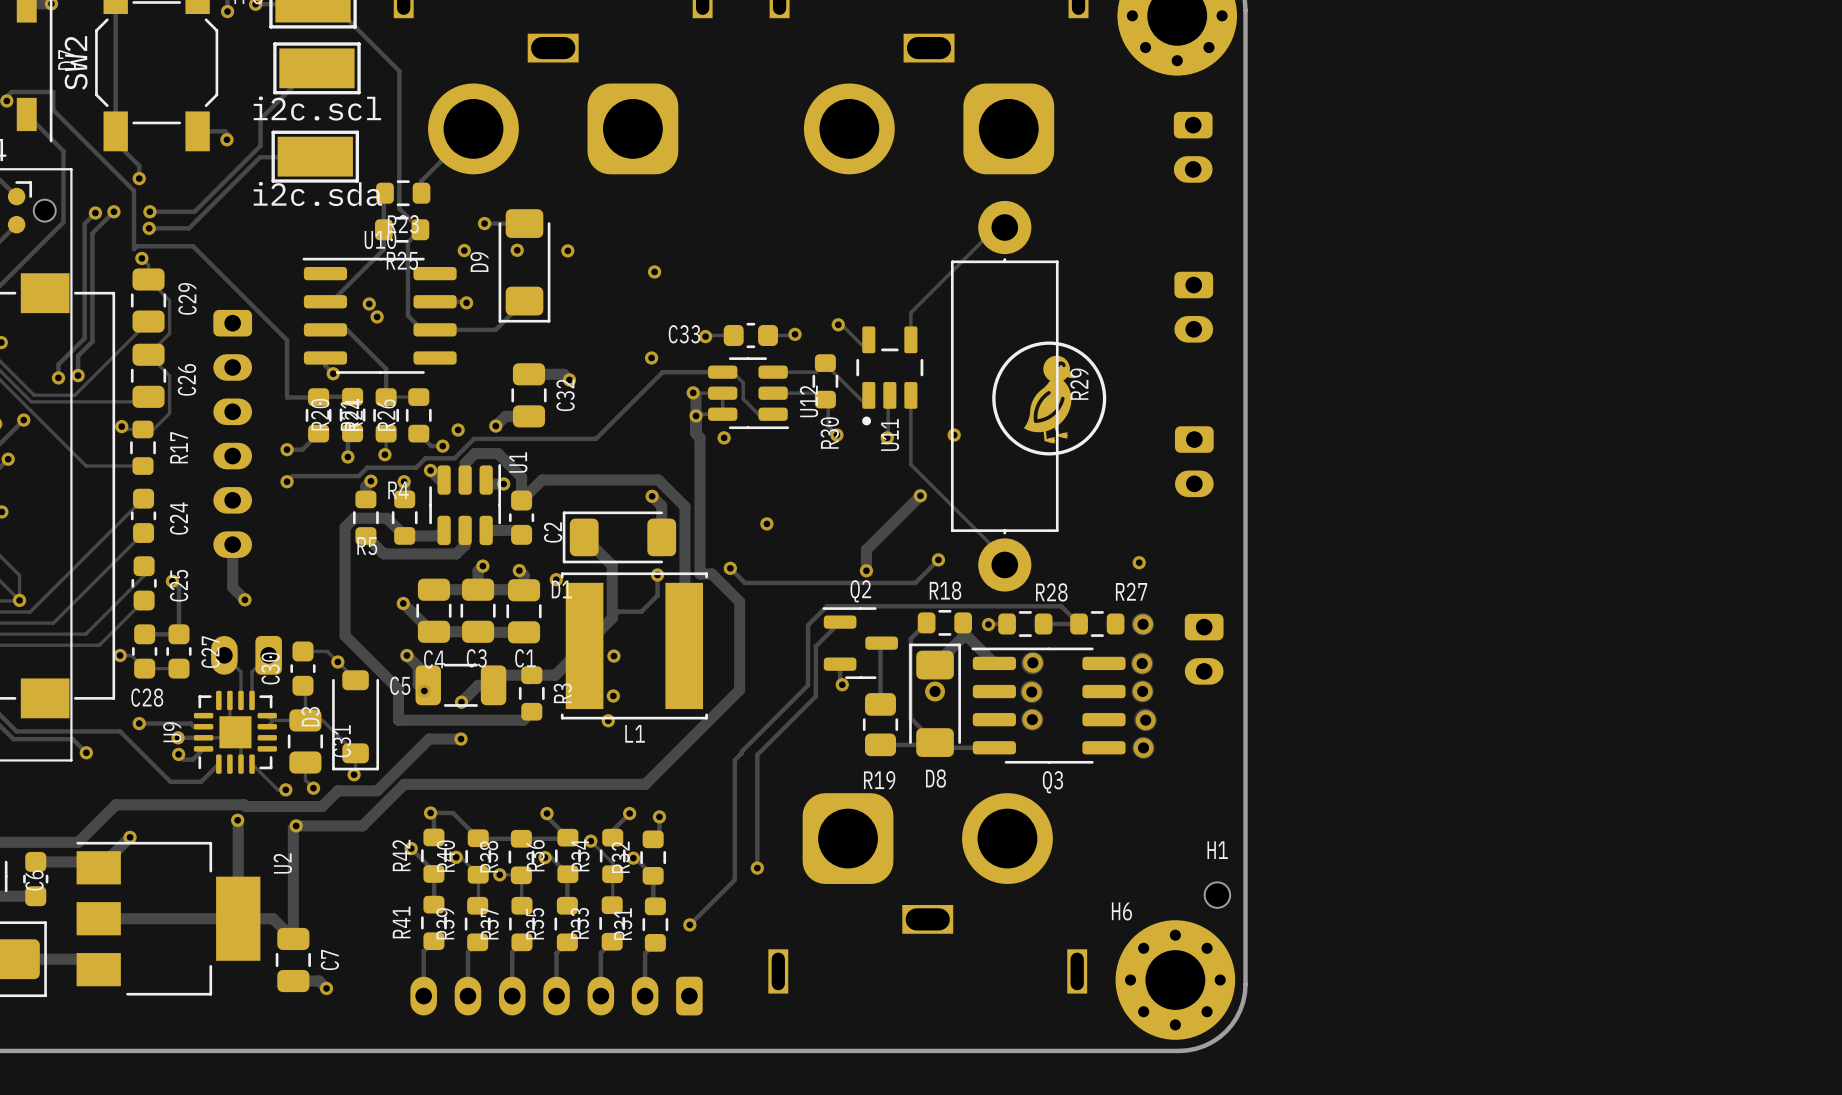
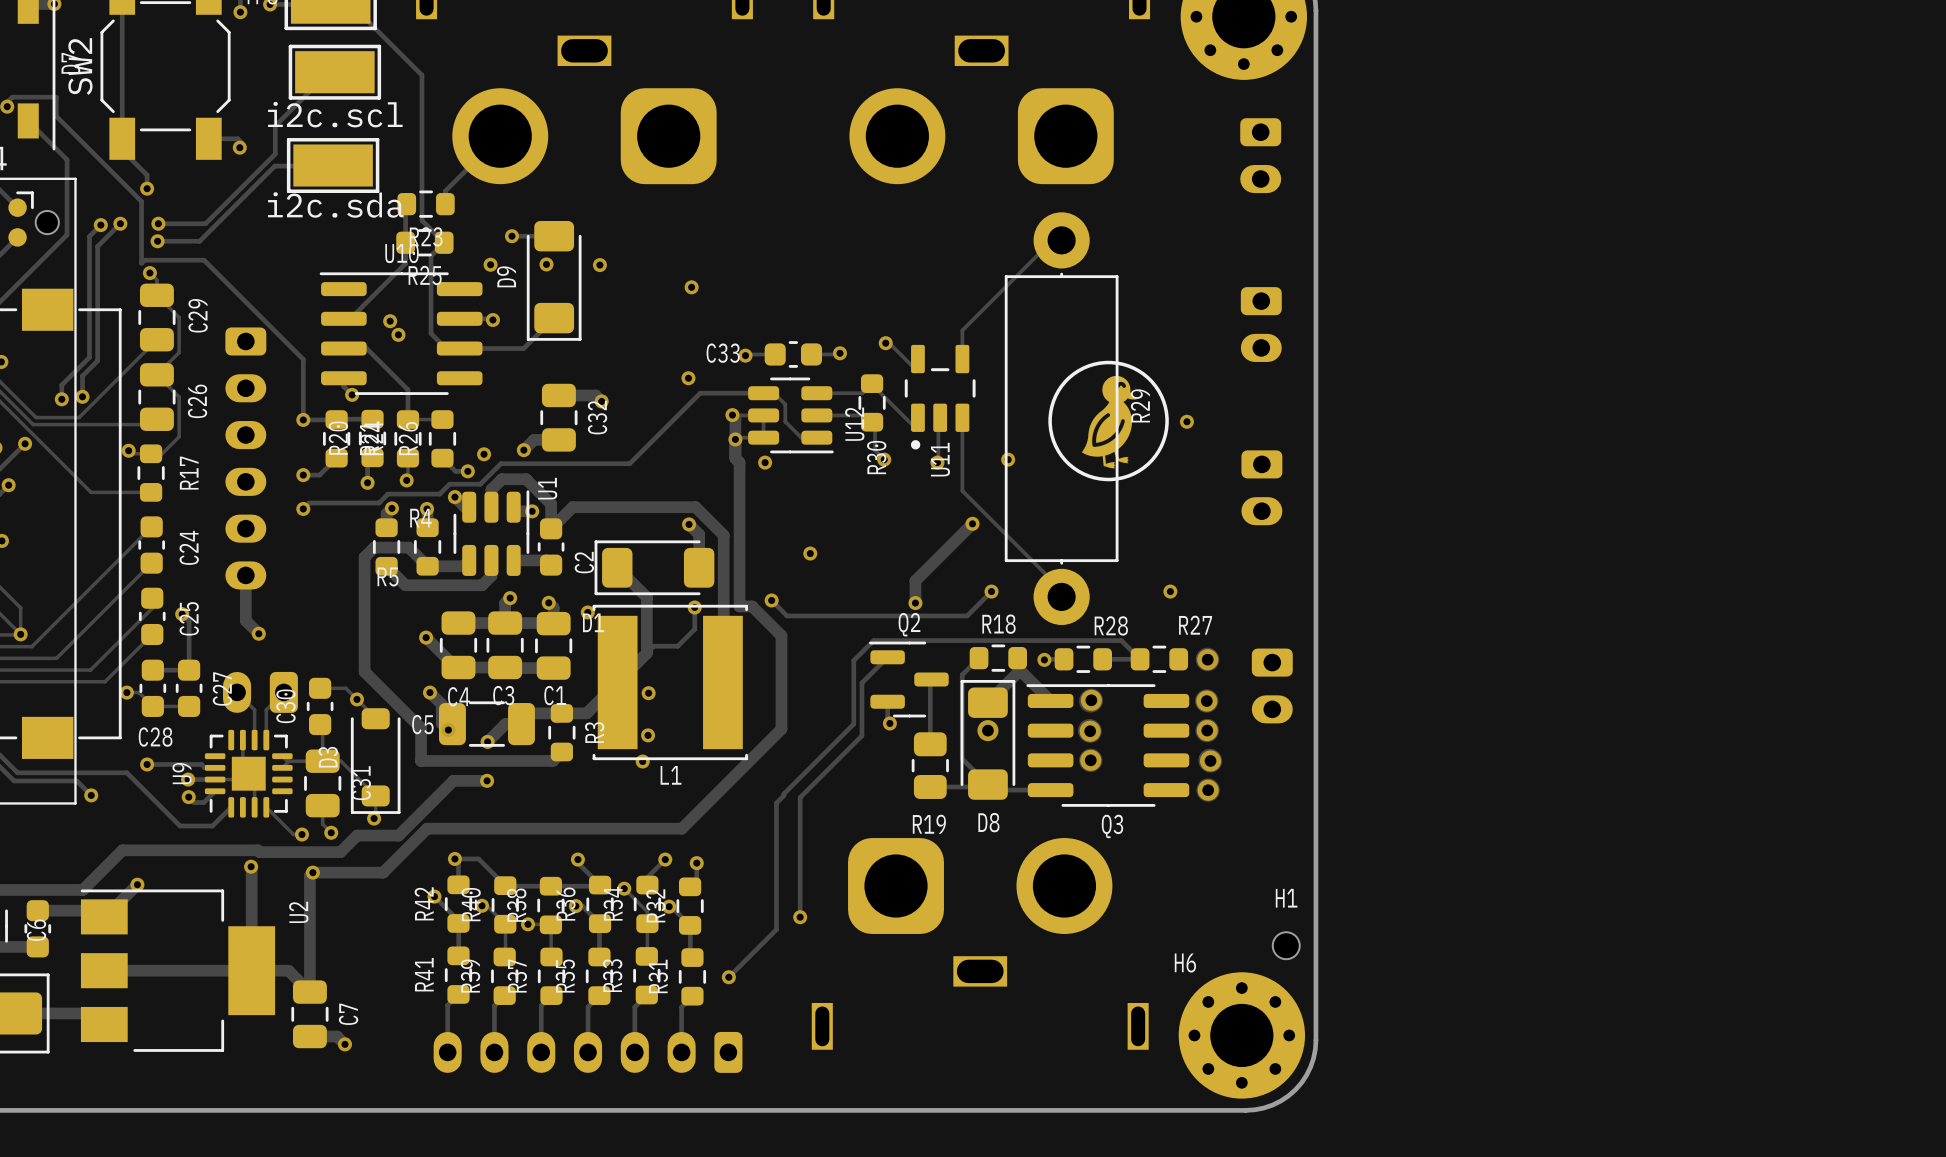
via: none -> (303, 419)
via: none -> (1186, 421)
via position: (1139, 562) -> (1170, 591)

